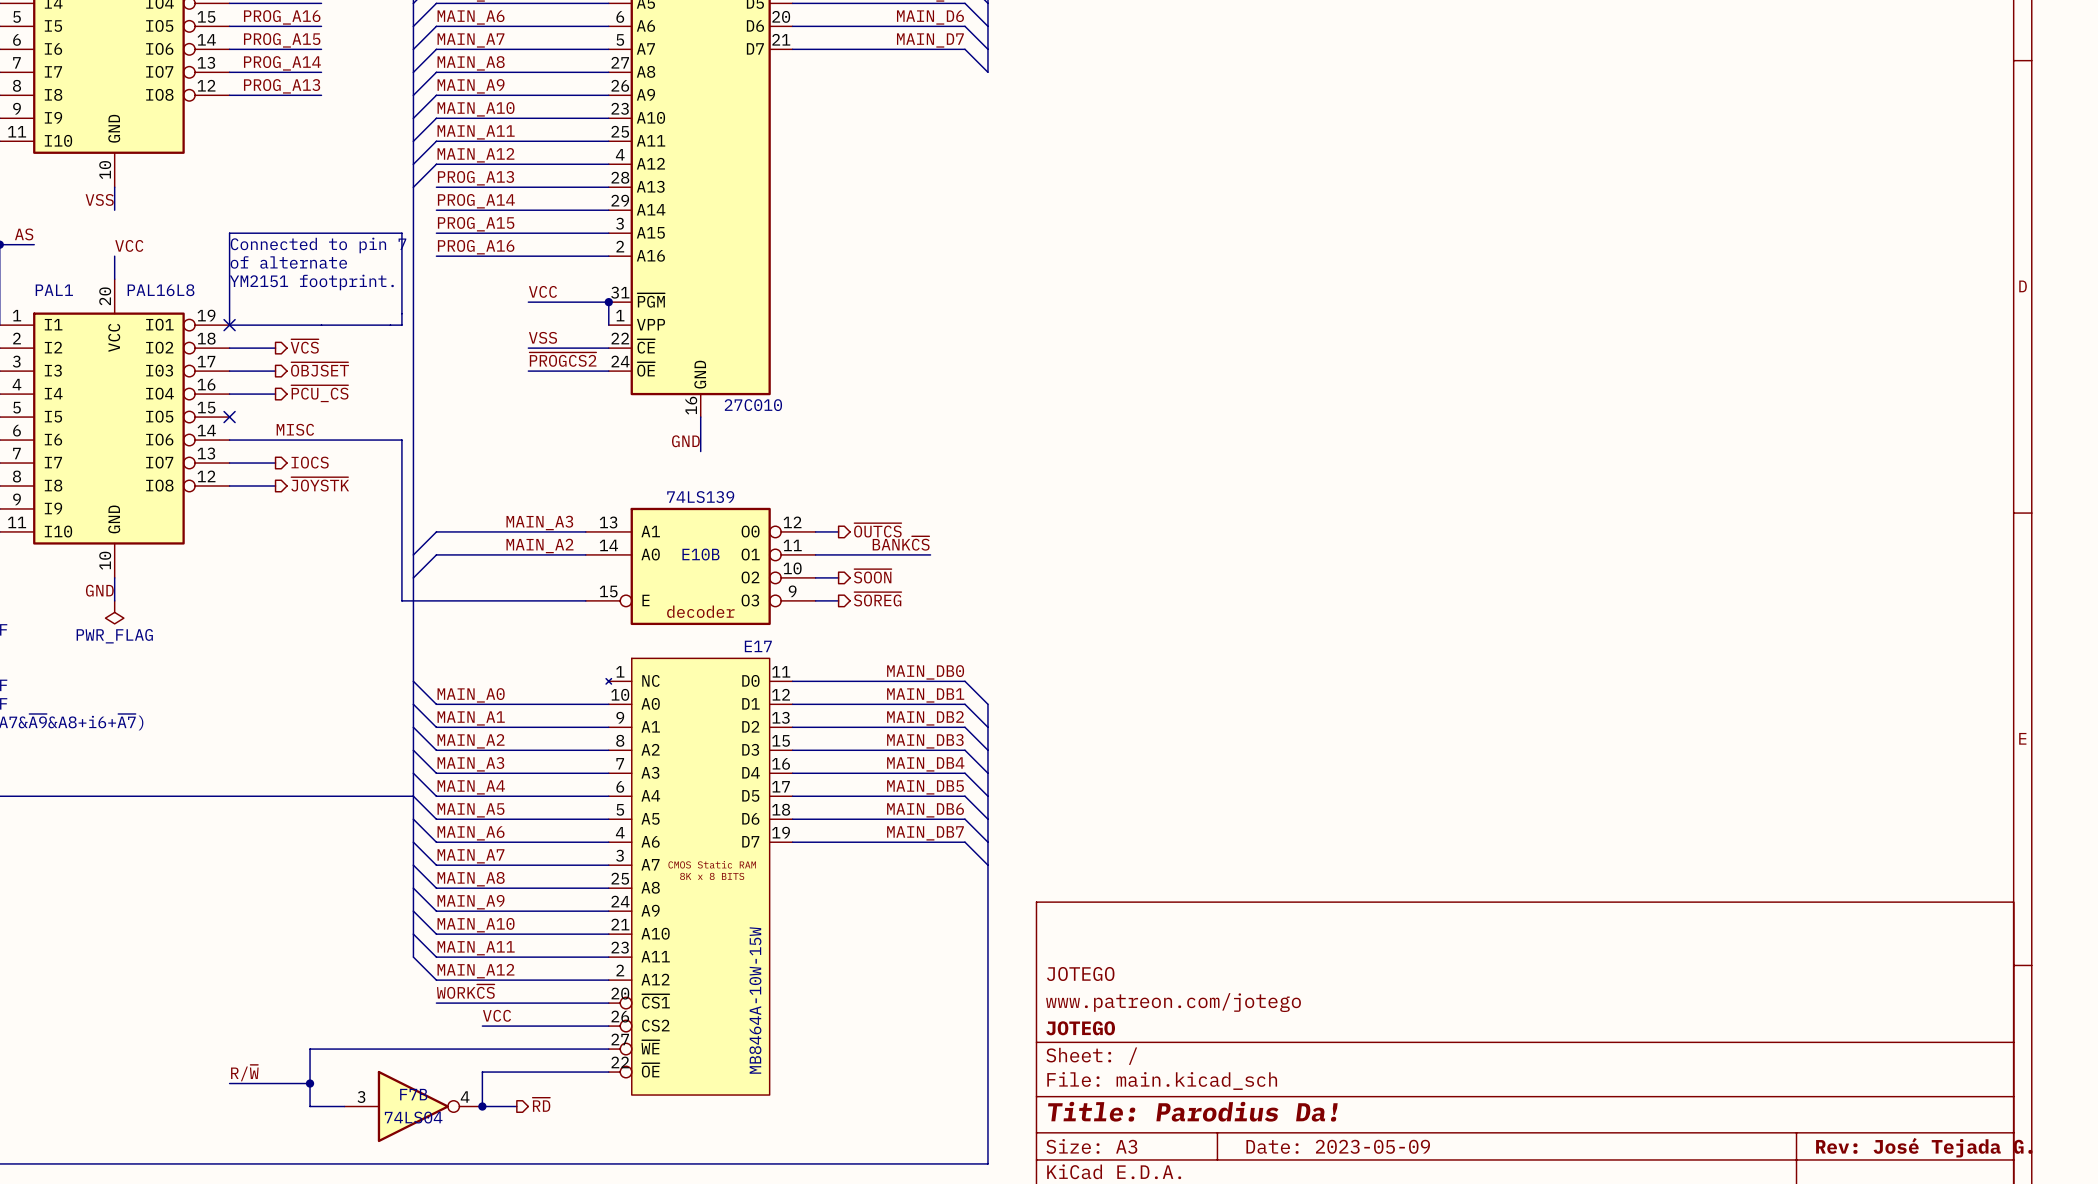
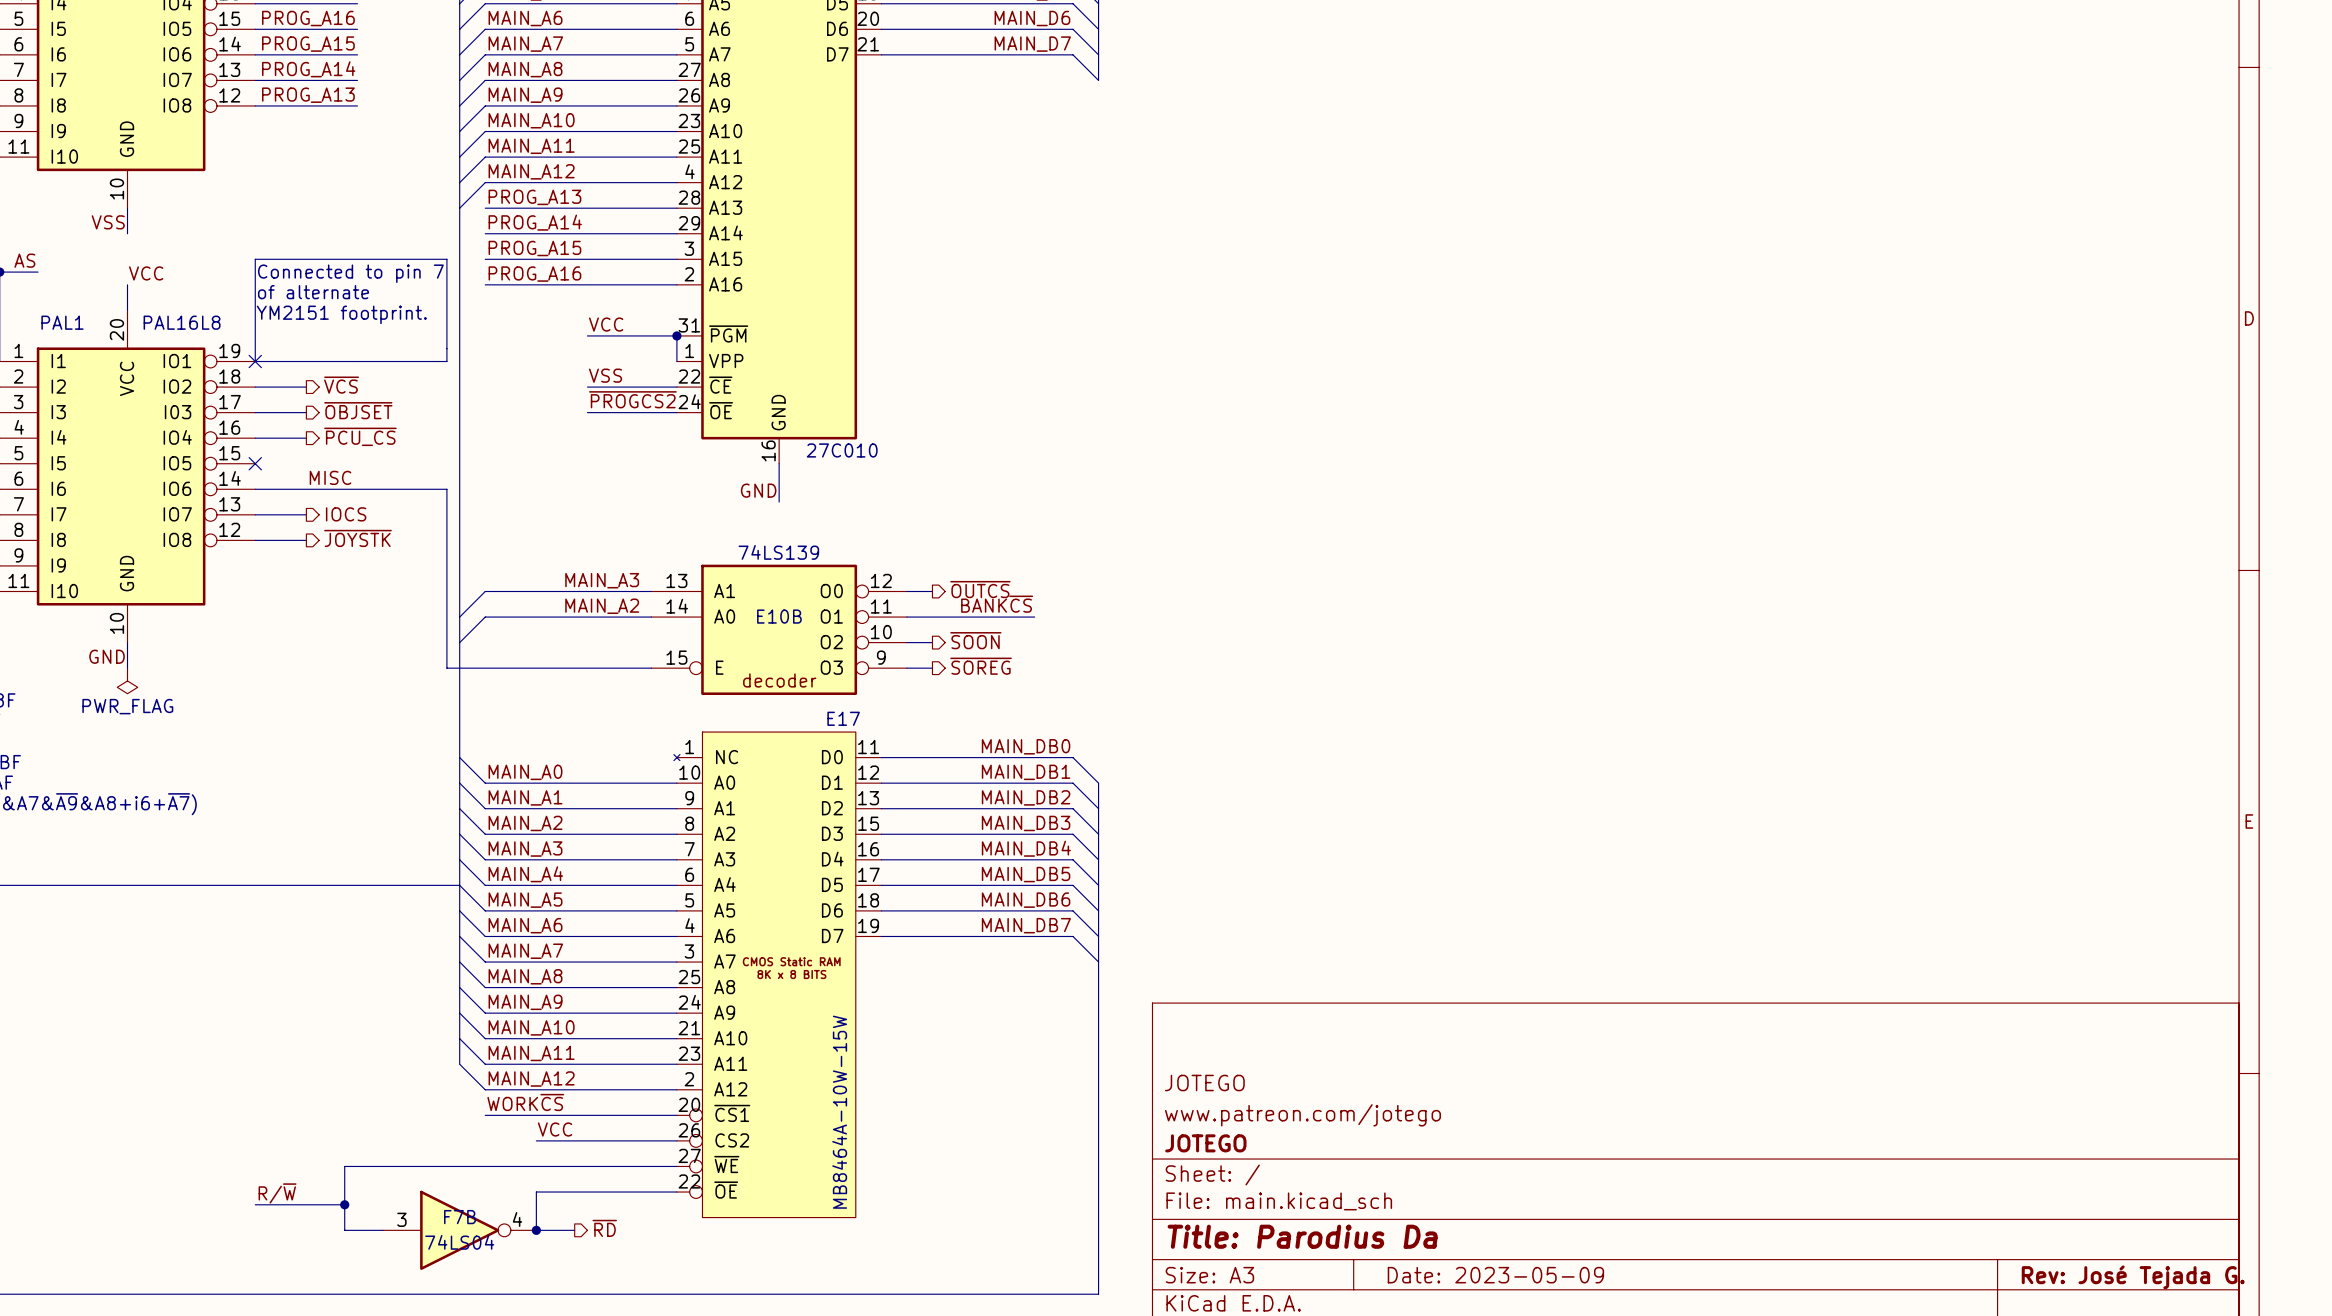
title block: Title: Parodius Da! (1192, 1111) -> Title: Parodius Da (1302, 1236)

